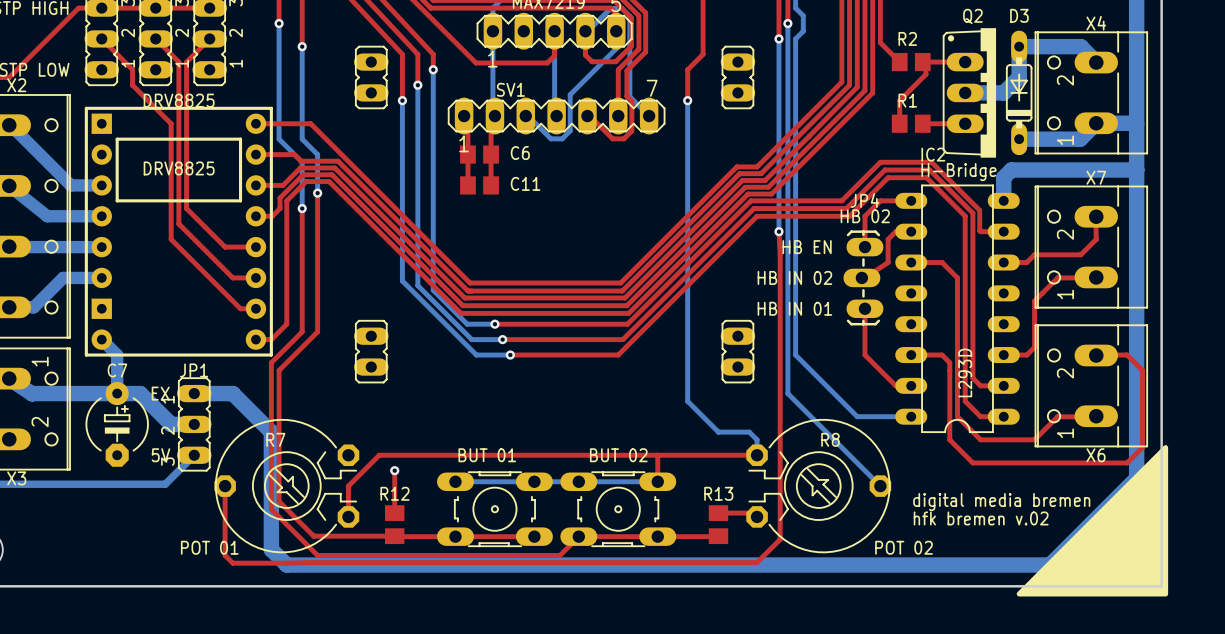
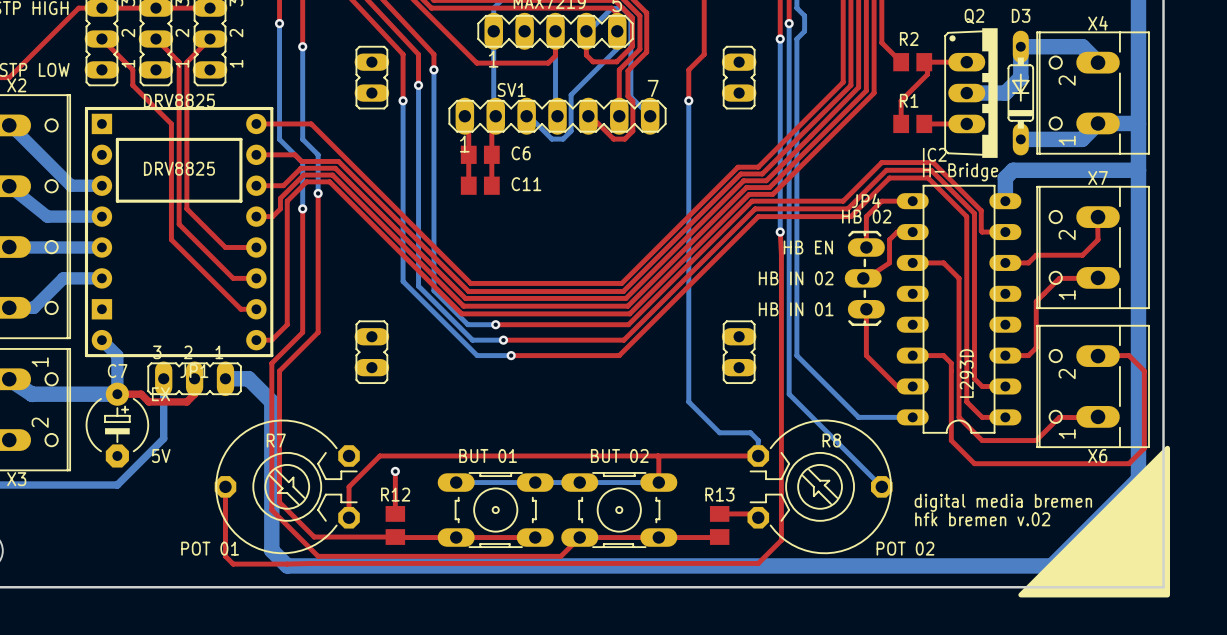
top track: none -> (194, 378) (194, 394) (186, 401) (148, 401) (141, 394) (117, 394)
bottom track: (117, 393) (140, 393) (171, 424) (194, 424) -> none
bottom track: (194, 393) (232, 393) (271, 432) -> (225, 378) (248, 378) (271, 401) (271, 432)
part rotation: 0° (194, 424) -> 90° clockwise (194, 378)
bottom track: (194, 455) (165, 484) (117, 484) -> (163, 378) (163, 438) (117, 485)

